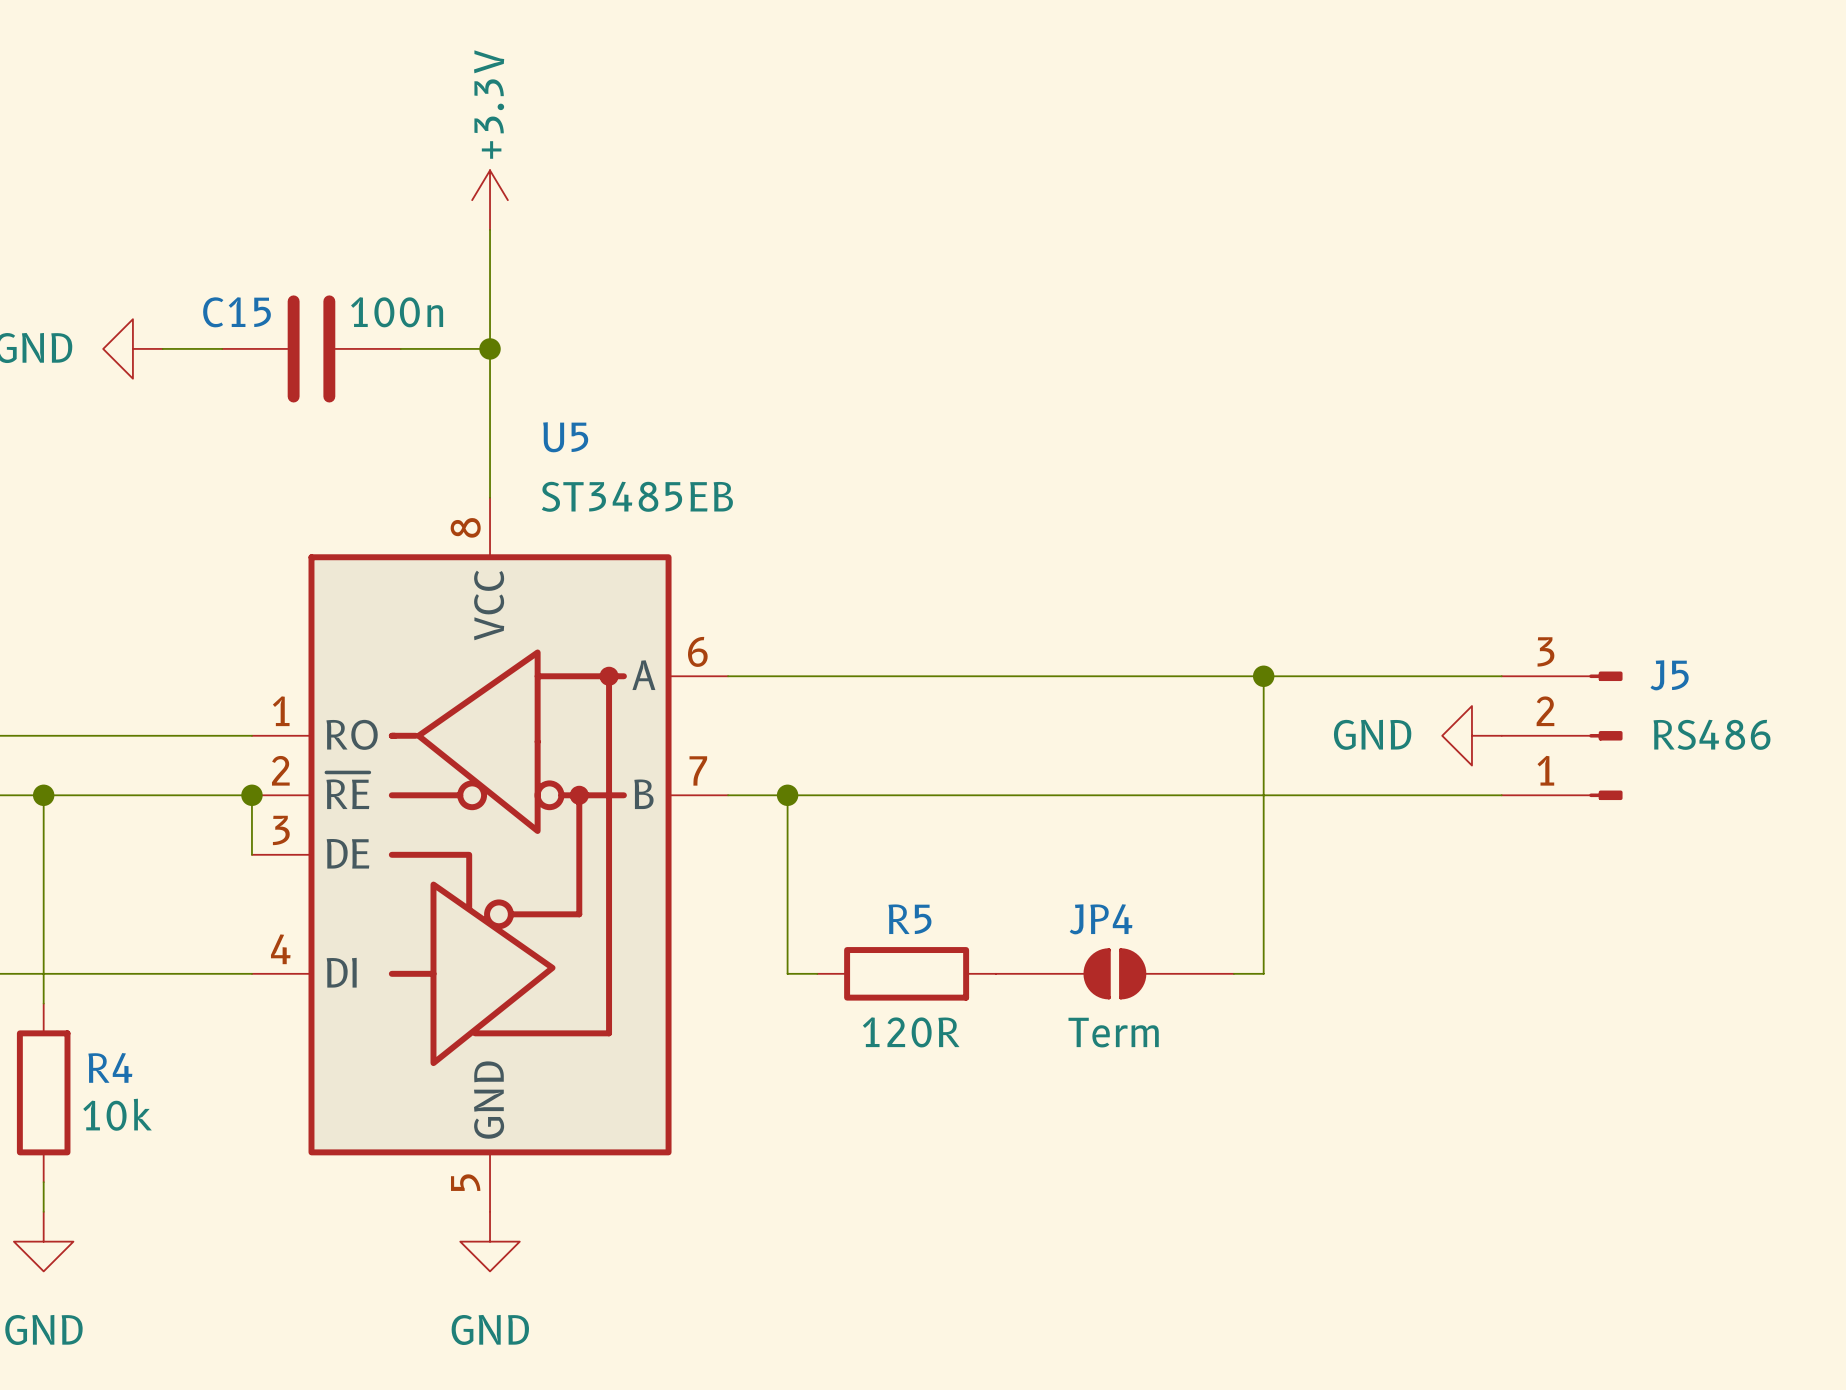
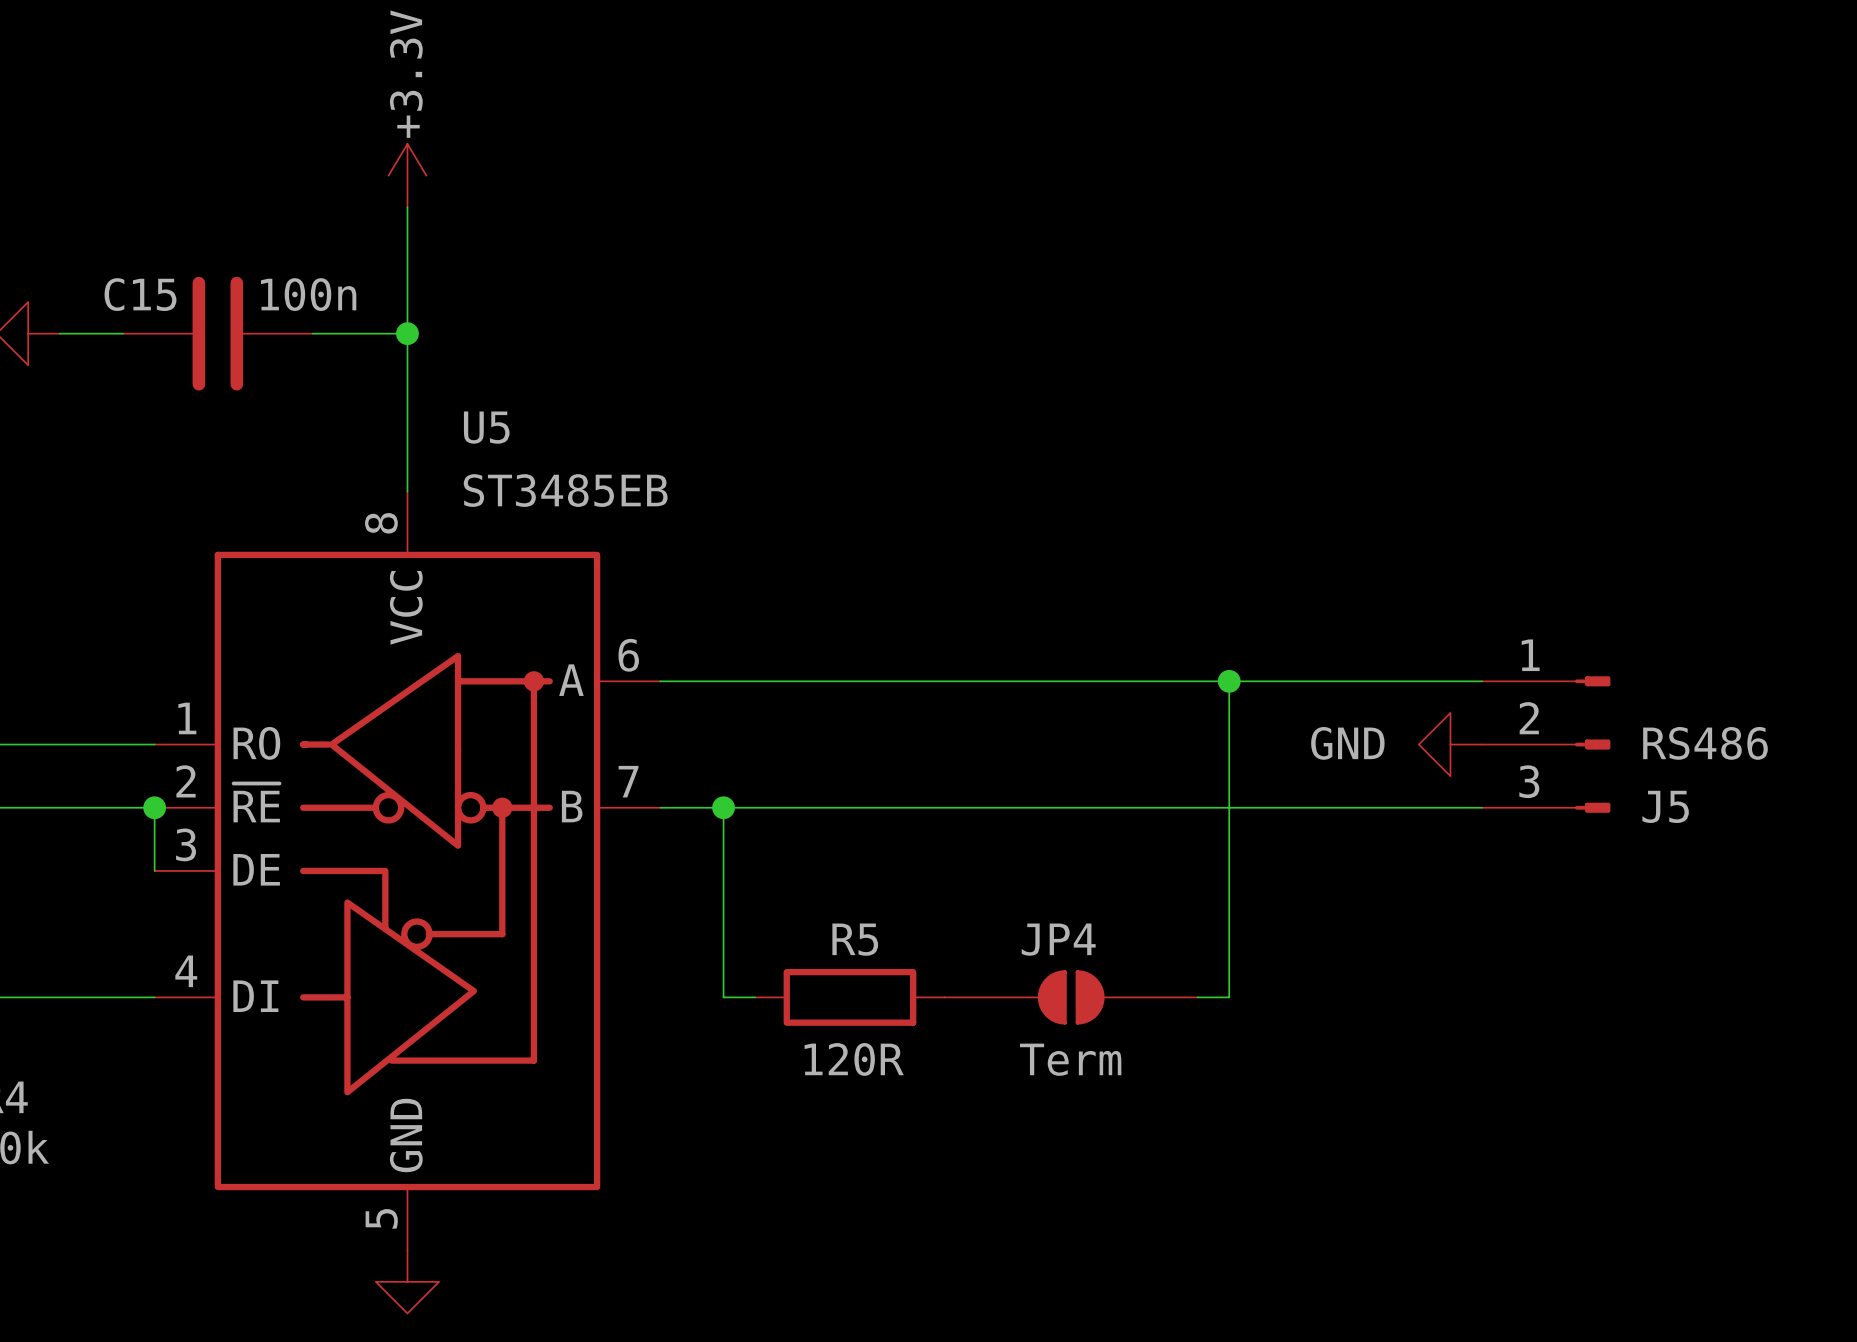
J5 flip: as is (1605, 735) -> up-down (1592, 744)

